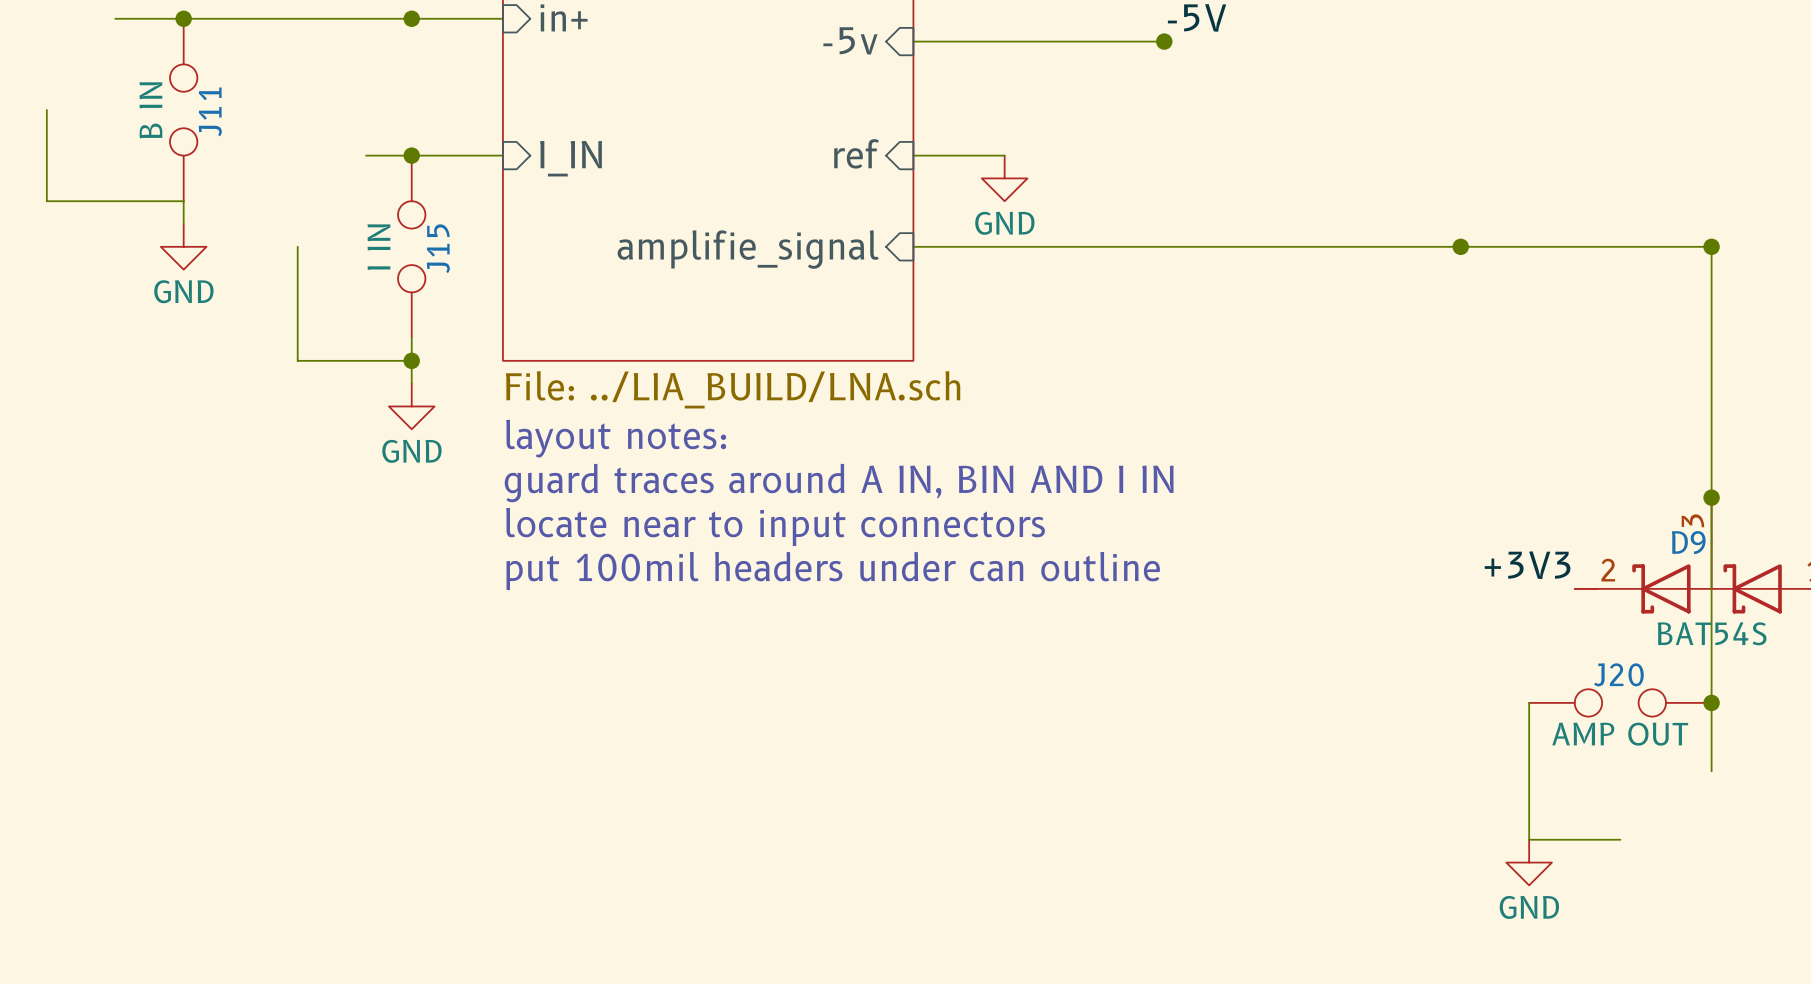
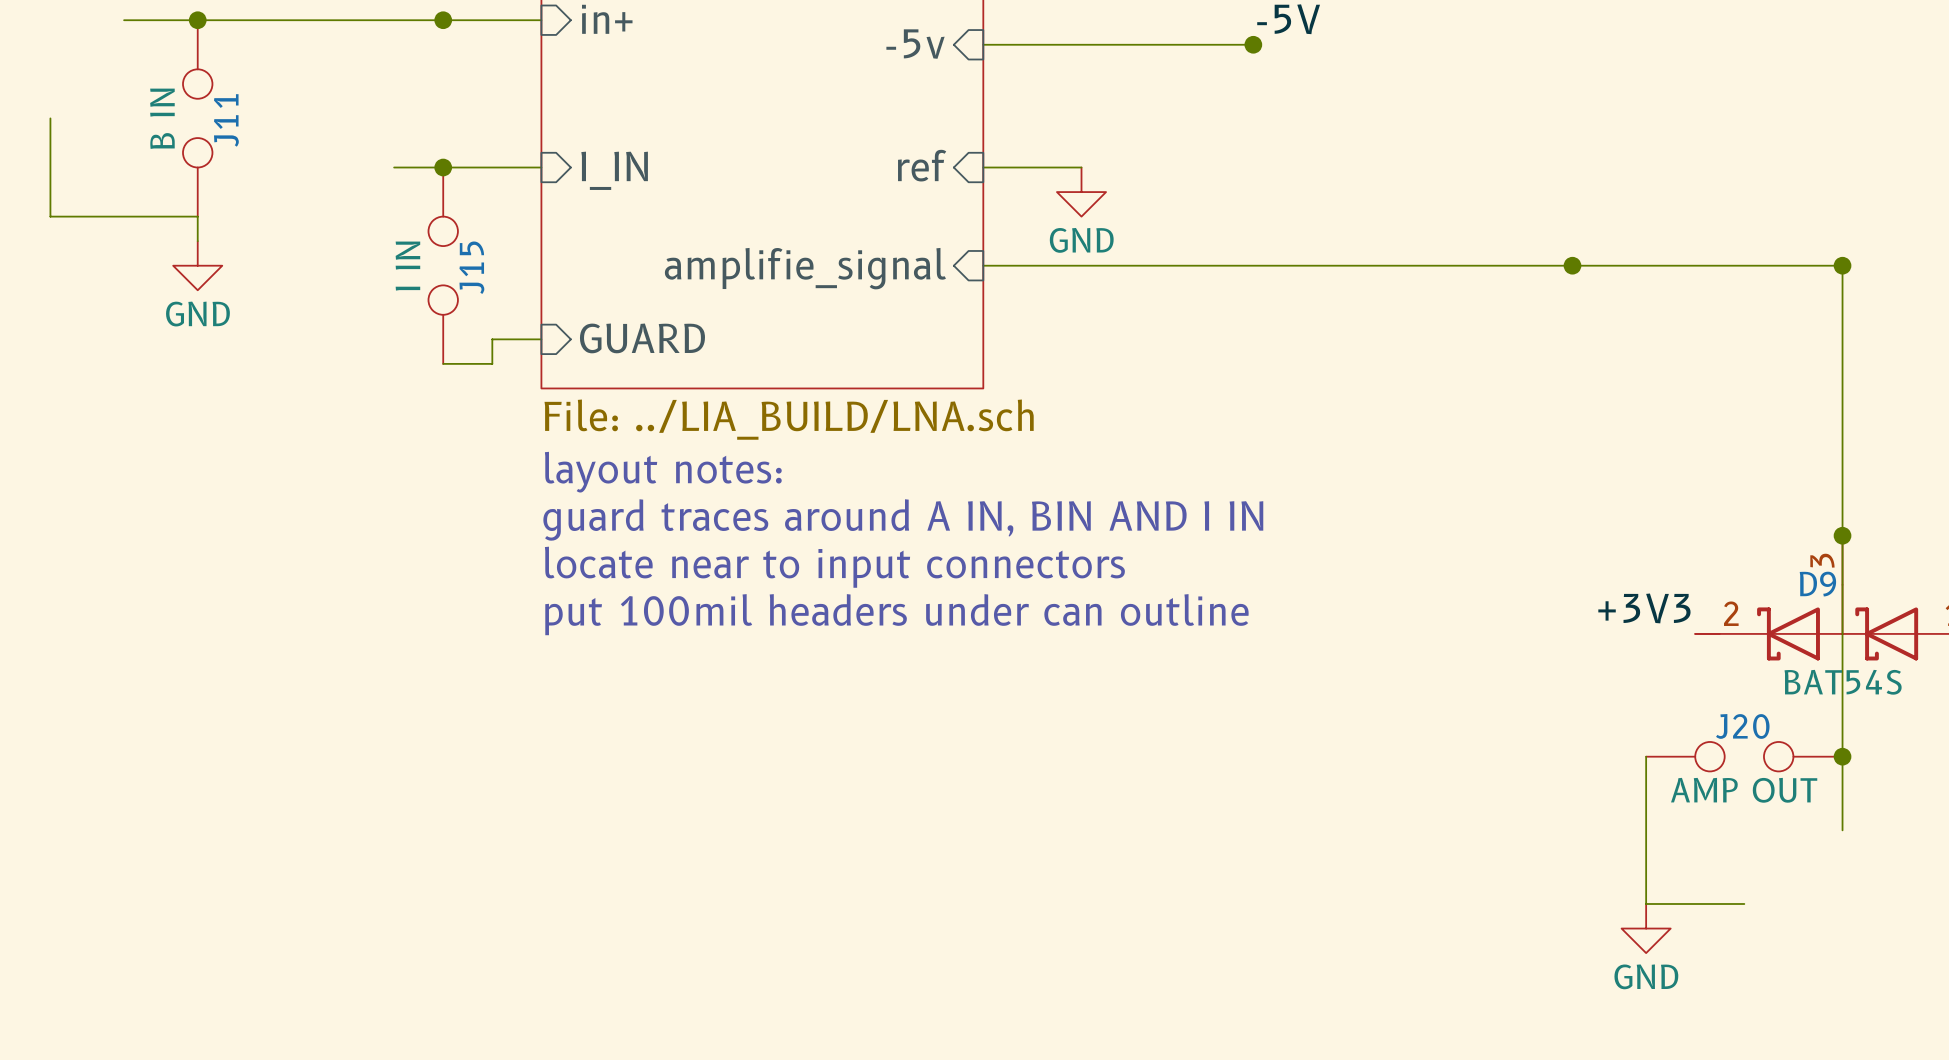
wire: (297, 246) (297, 360) (411, 360) -> none
sheet pin: none -> GUARD (642, 338)
wire: (411, 338) (411, 383) -> (443, 363) (492, 363) (492, 339) (541, 339)
junction: (411, 360) -> none
power symbol: GND (411, 406) -> none

